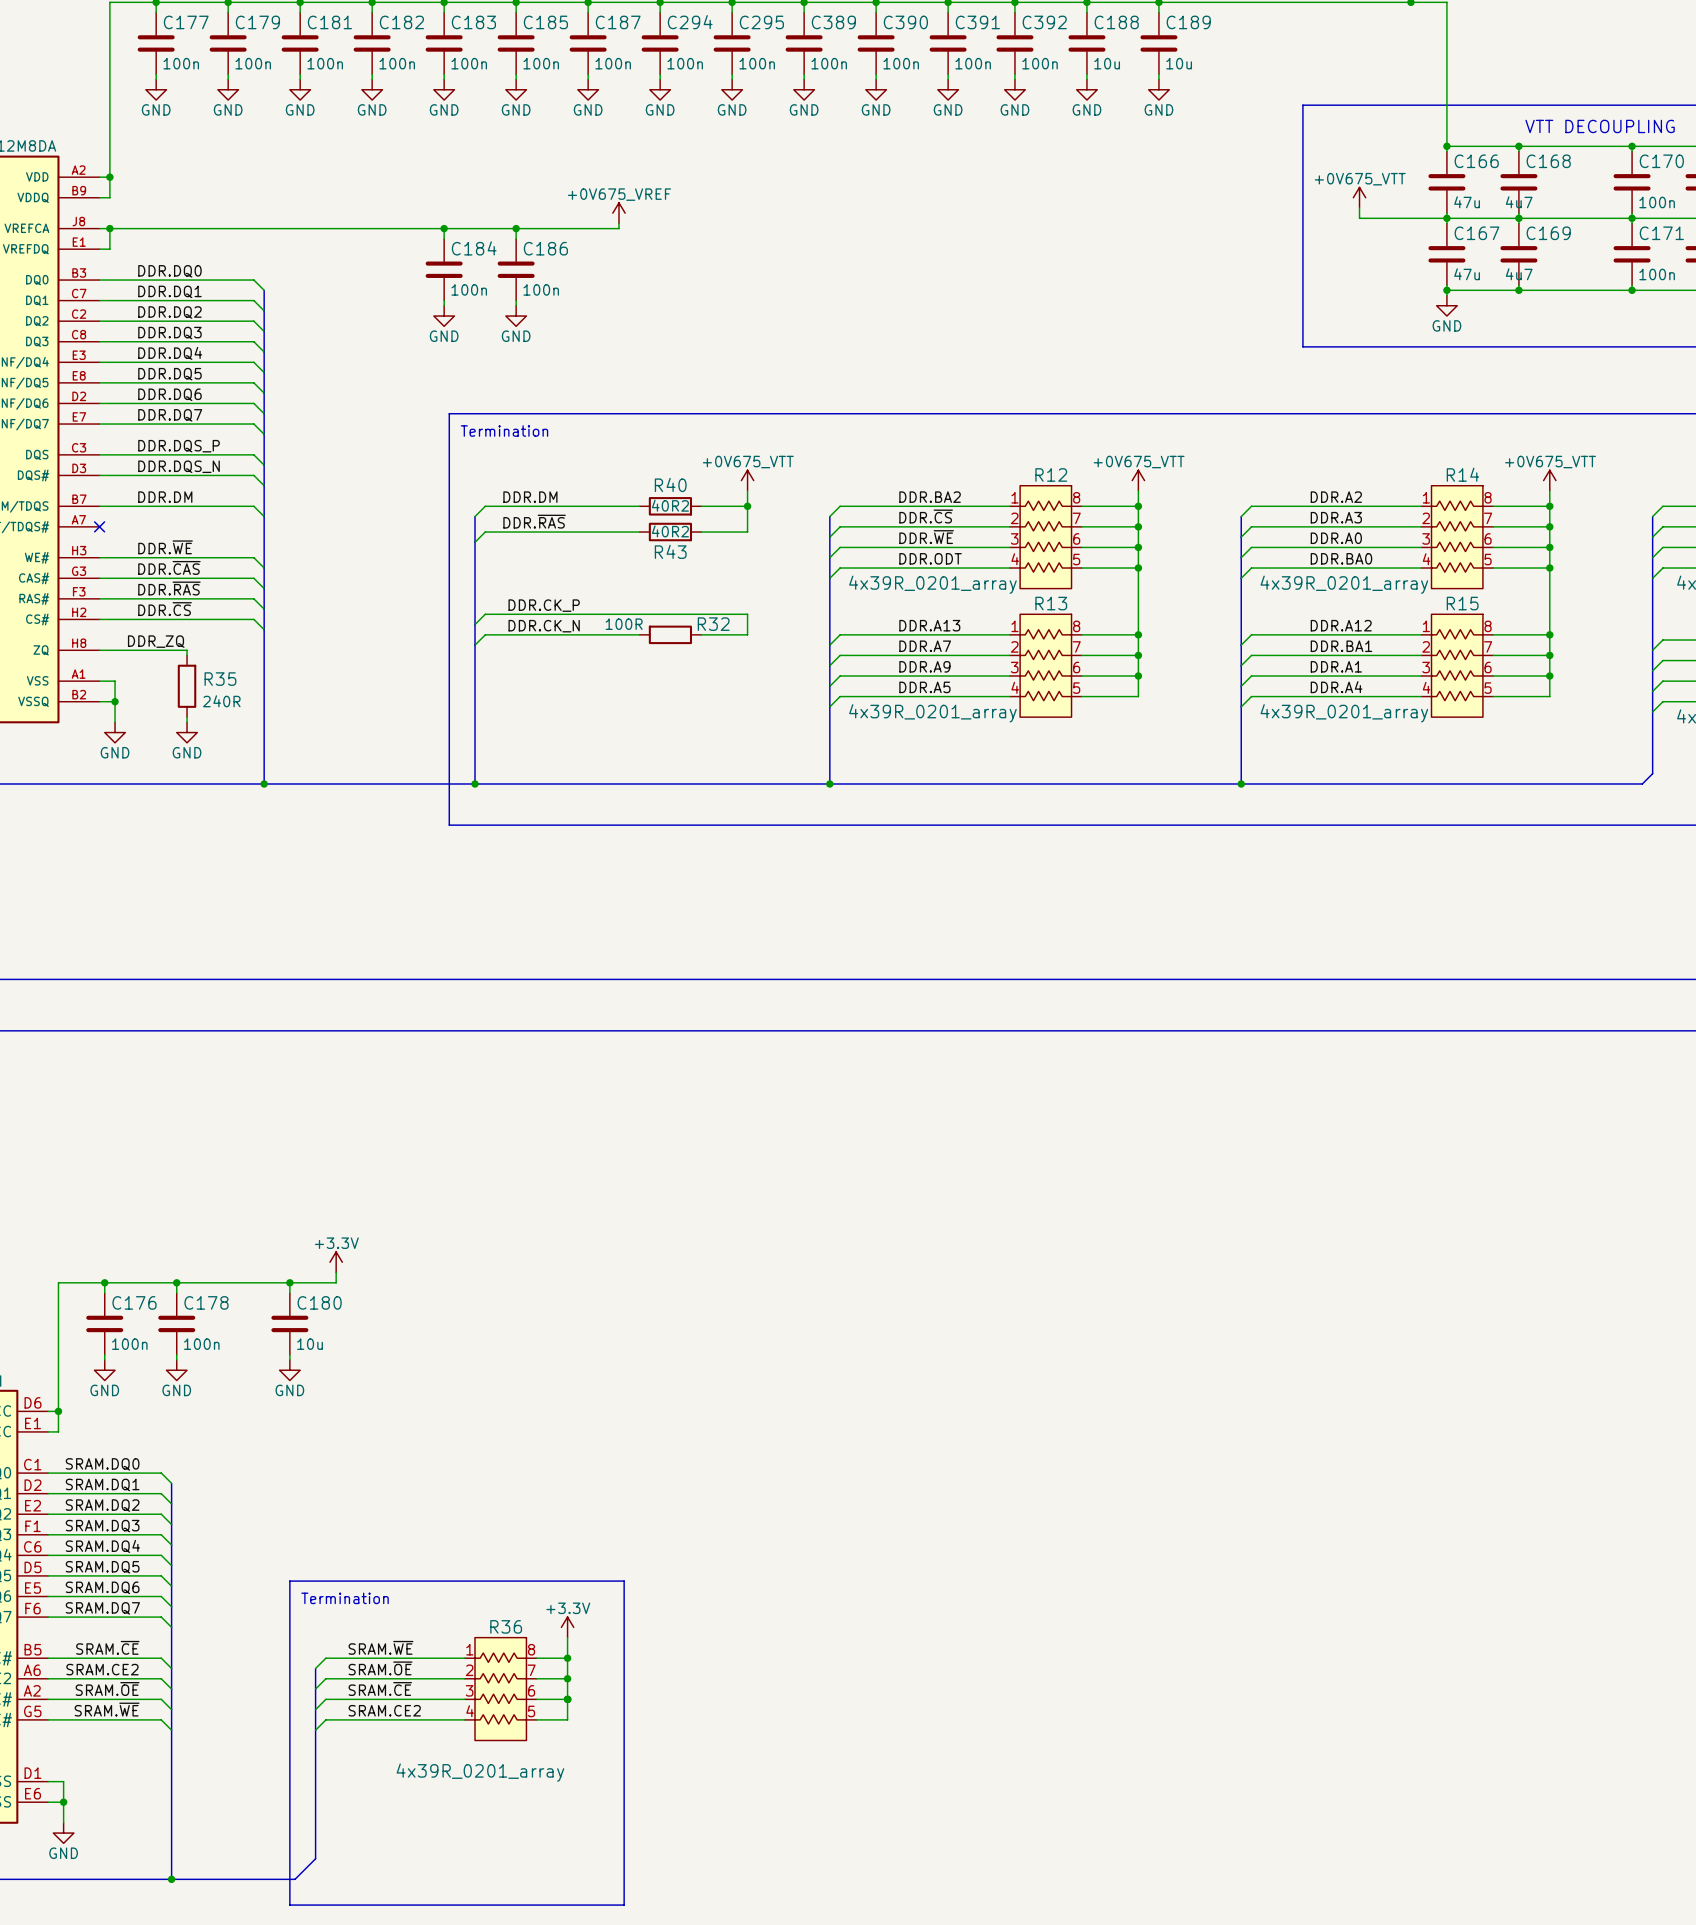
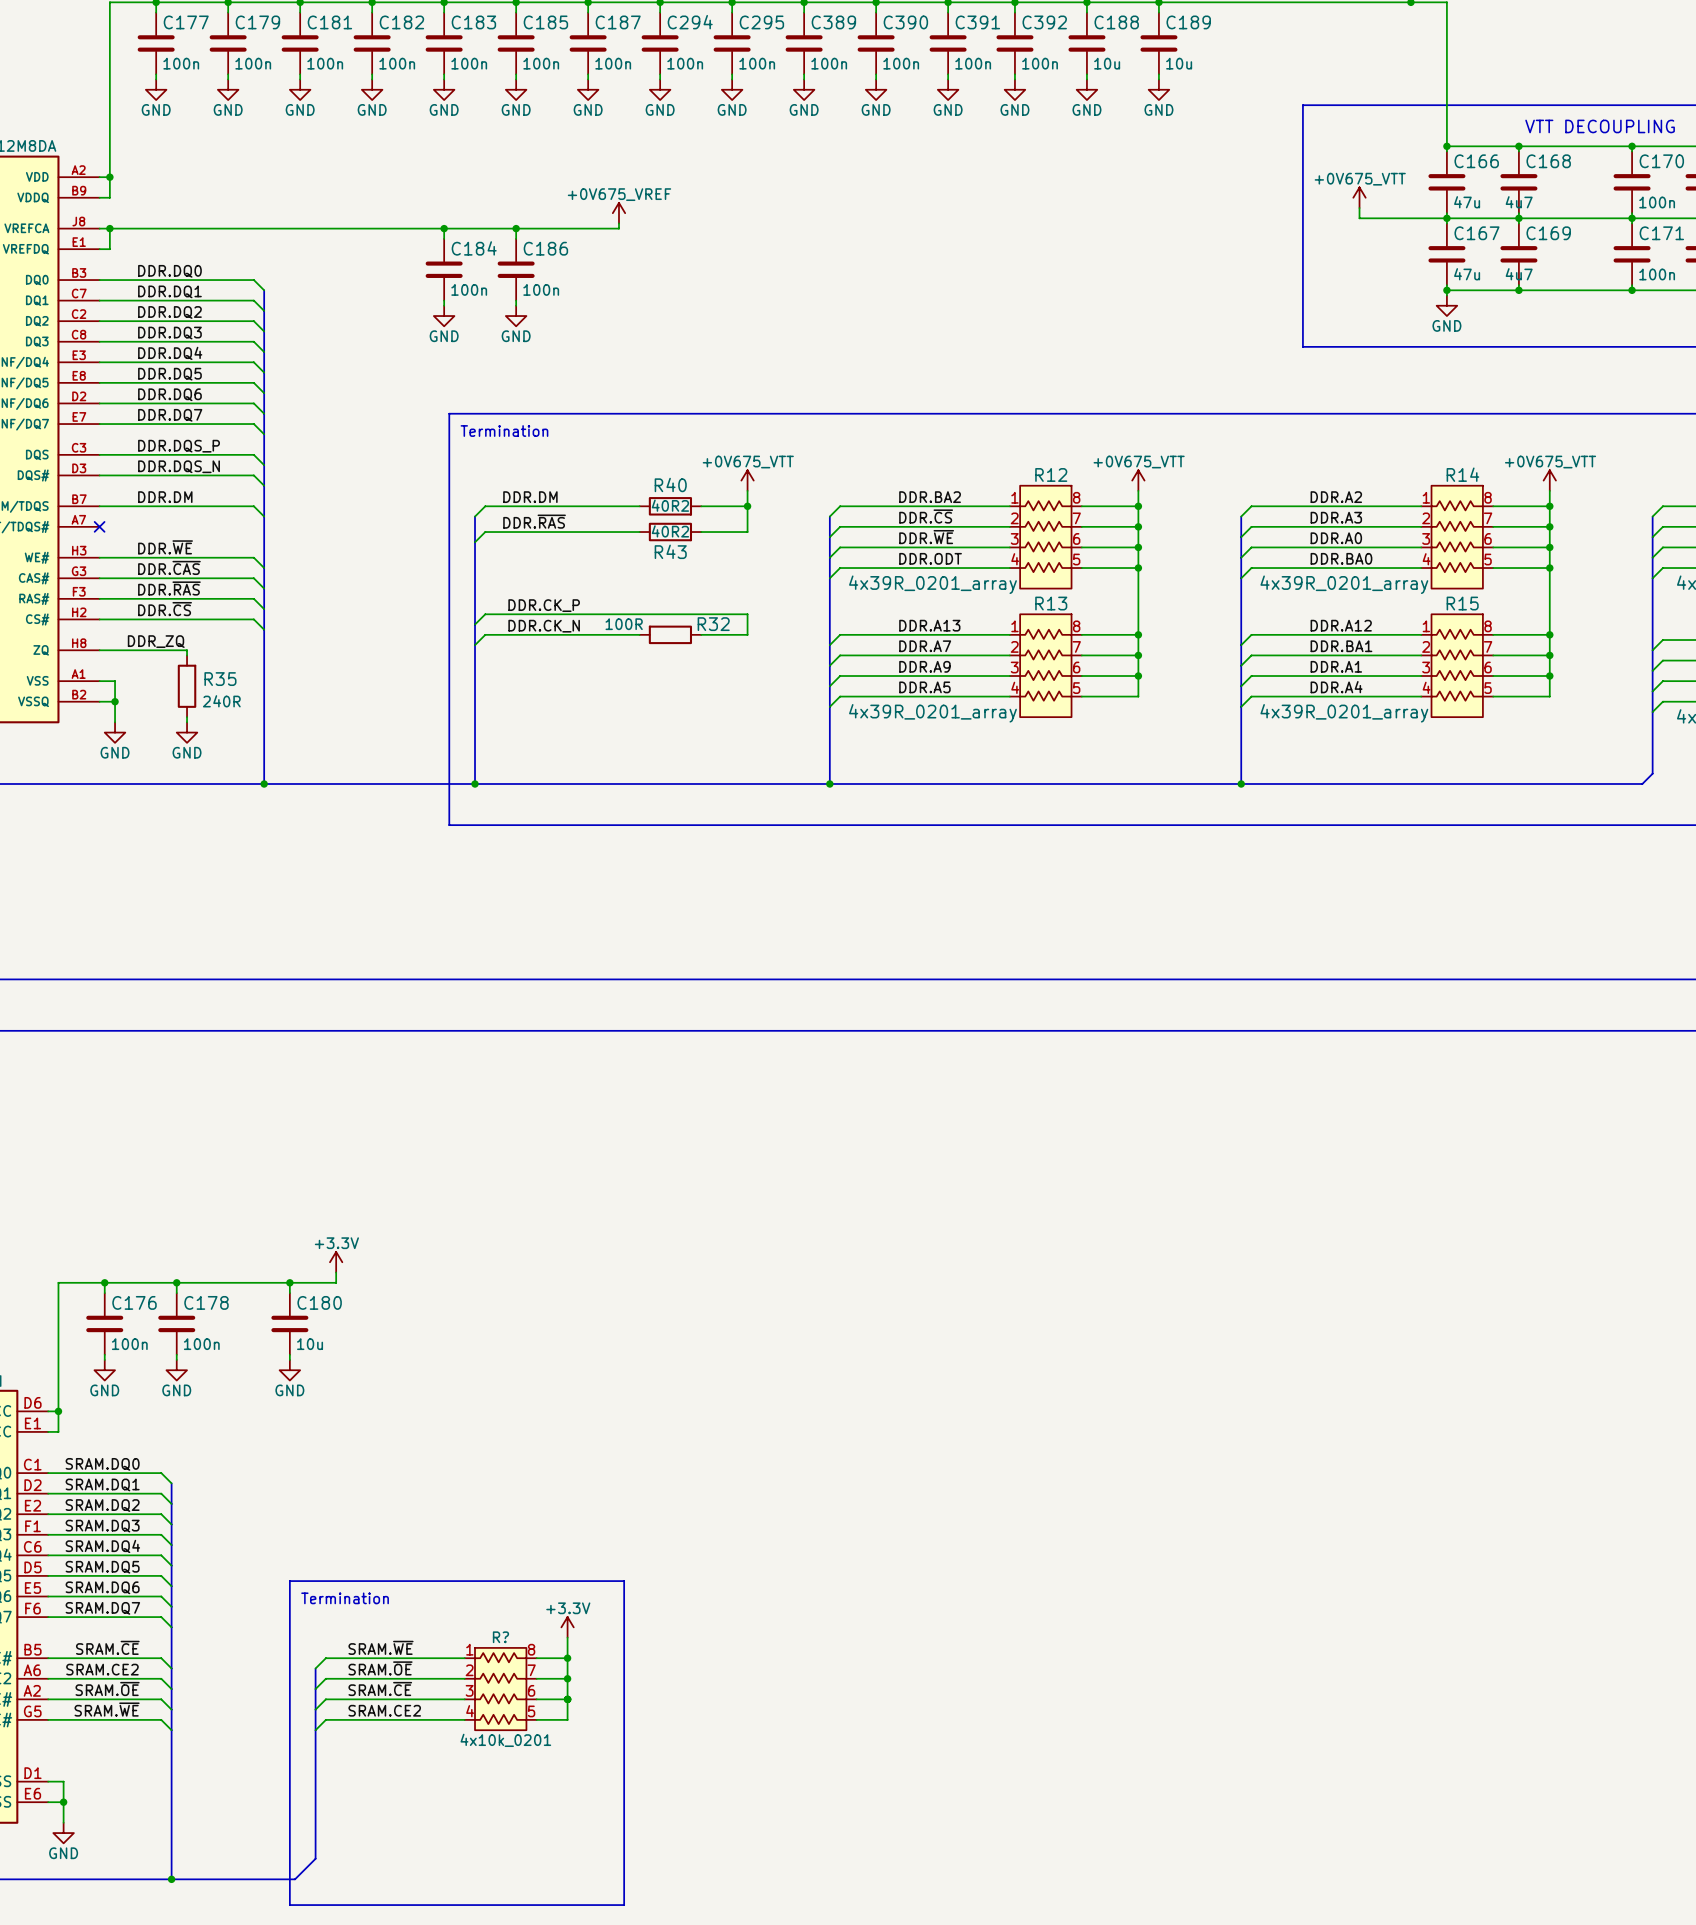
R36: 4x39R_0201_array (500, 1689) -> none
R?: none -> (500, 1689)

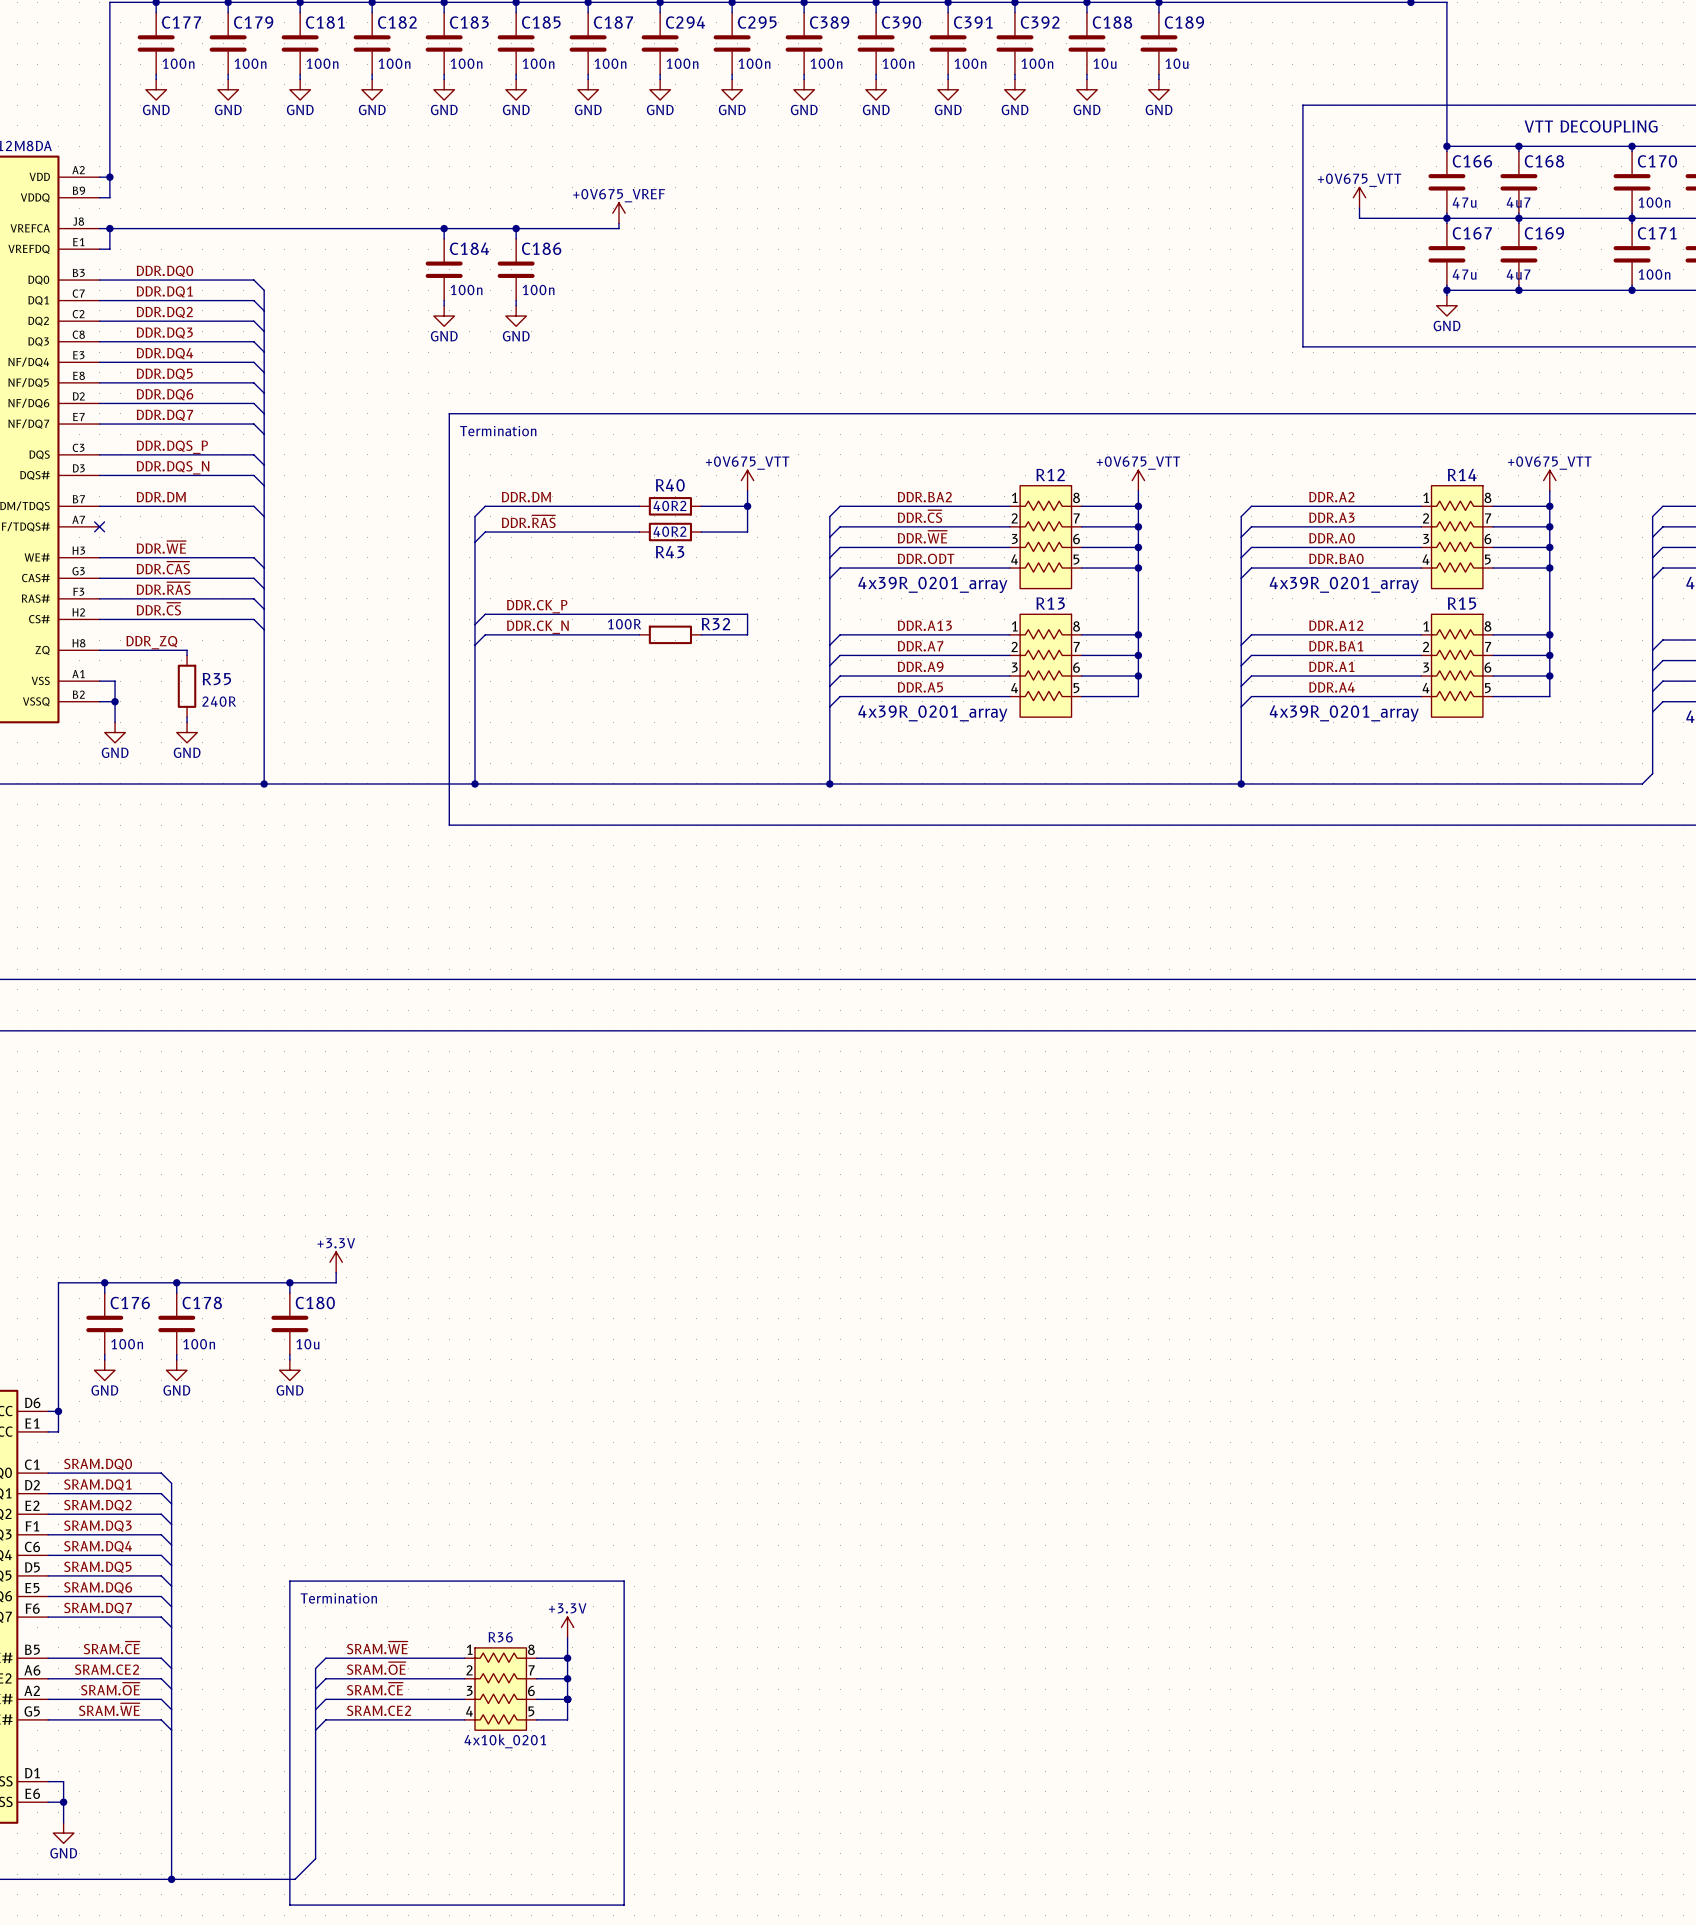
R? name: R? (500, 1637) -> R36 (500, 1637)

